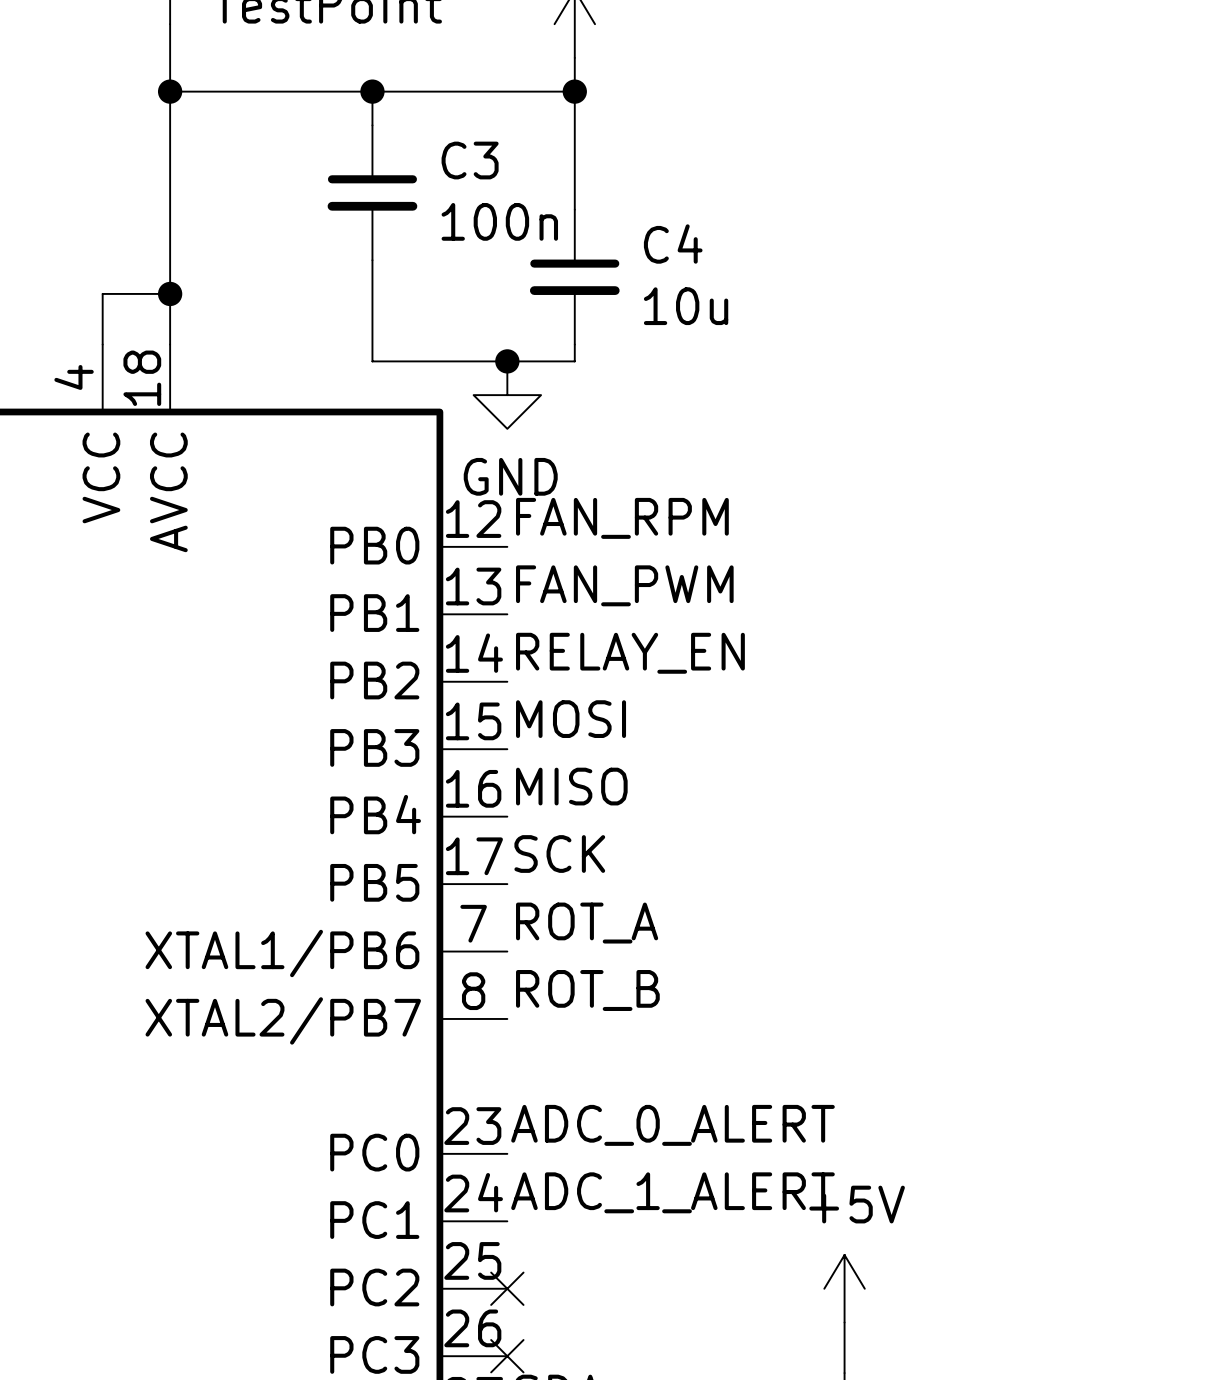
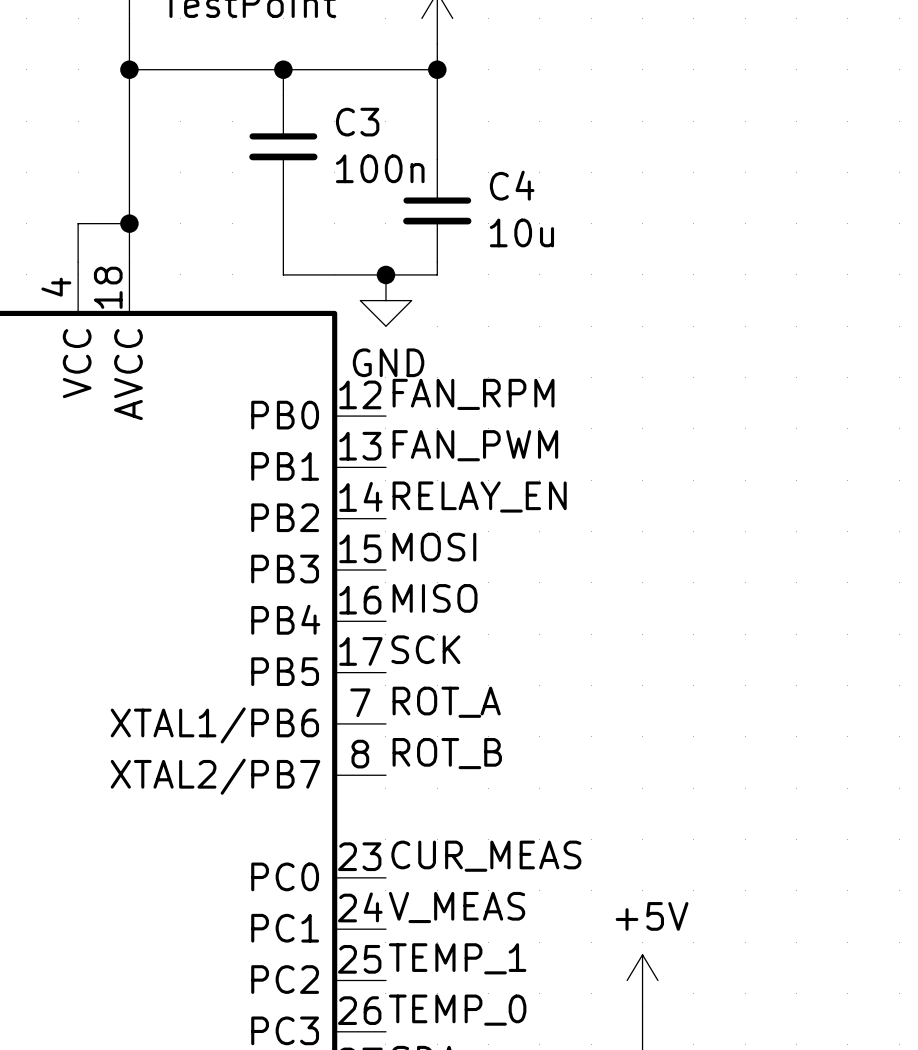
label: ADC_0_ALERT (673, 1125) -> CUR_MEAS (486, 856)
label: ADC_1_ALERT (673, 1192) -> V_MEAS (457, 907)
label: none -> TEMP_1 (457, 958)
no-connect mark: (507, 1288) -> none
label: none -> TEMP_0 (457, 1010)
no-connect mark: (507, 1356) -> none

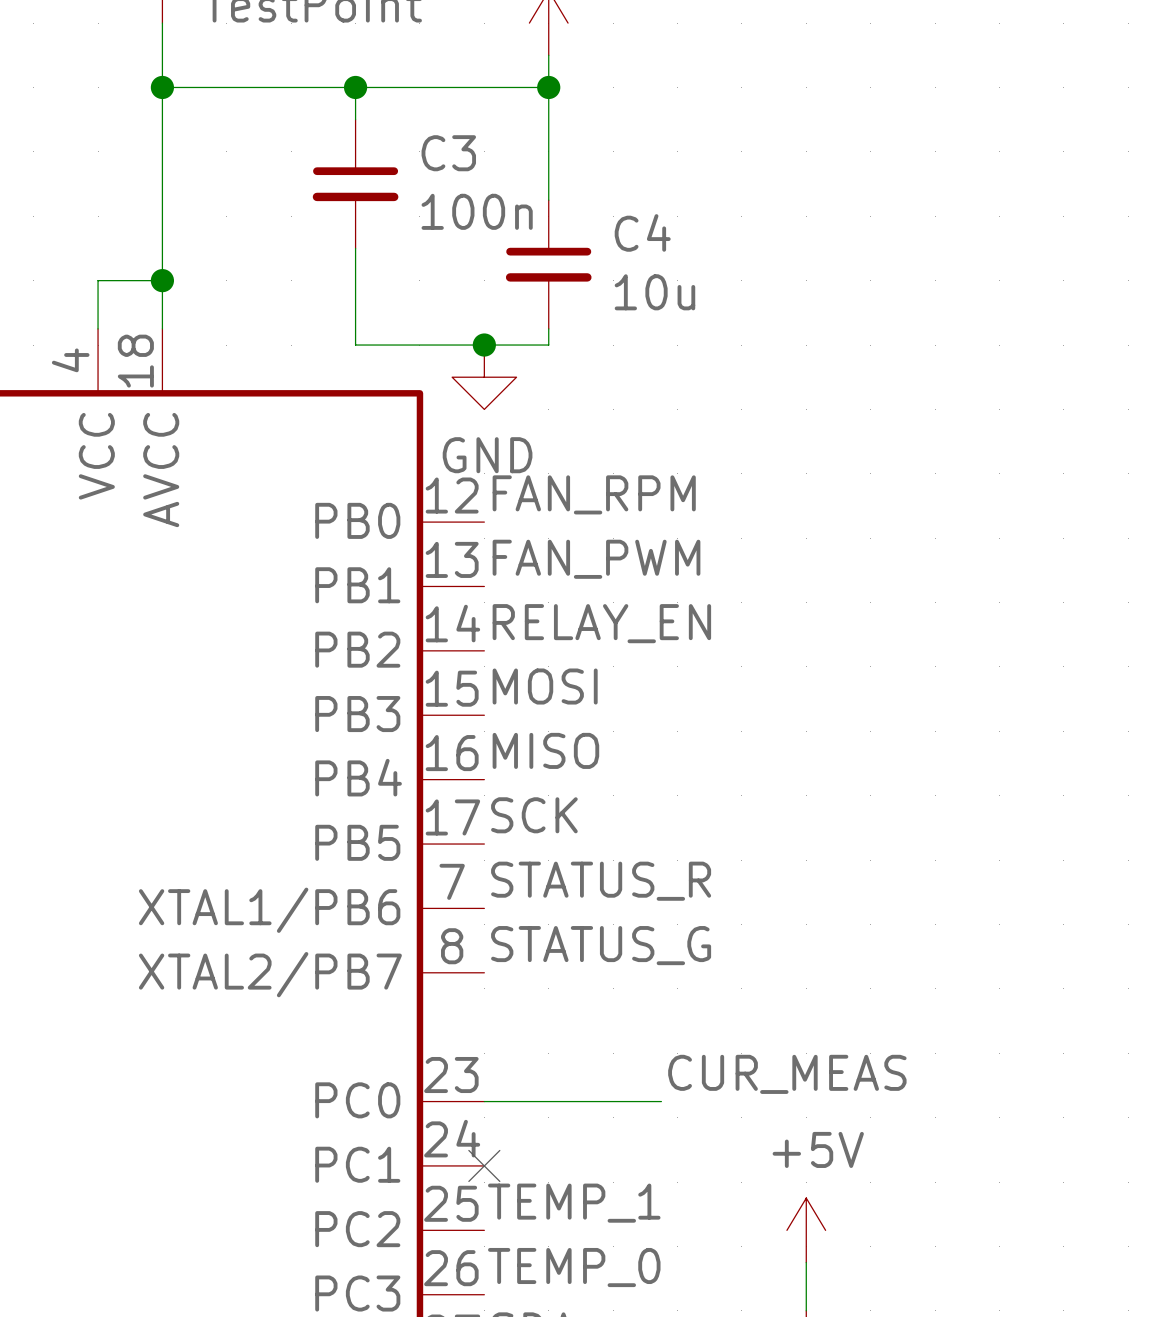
label: ROT_A (446, 702) -> STATUS_R (601, 881)
label: ROT_B (447, 753) -> STATUS_G (601, 945)
label position: CUR_MEAS (486, 856) -> CUR_MEAS (787, 1074)
wire: none -> (484, 1101) (661, 1101)
label: V_MEAS (457, 907) -> none
no-connect mark: none -> (484, 1165)

